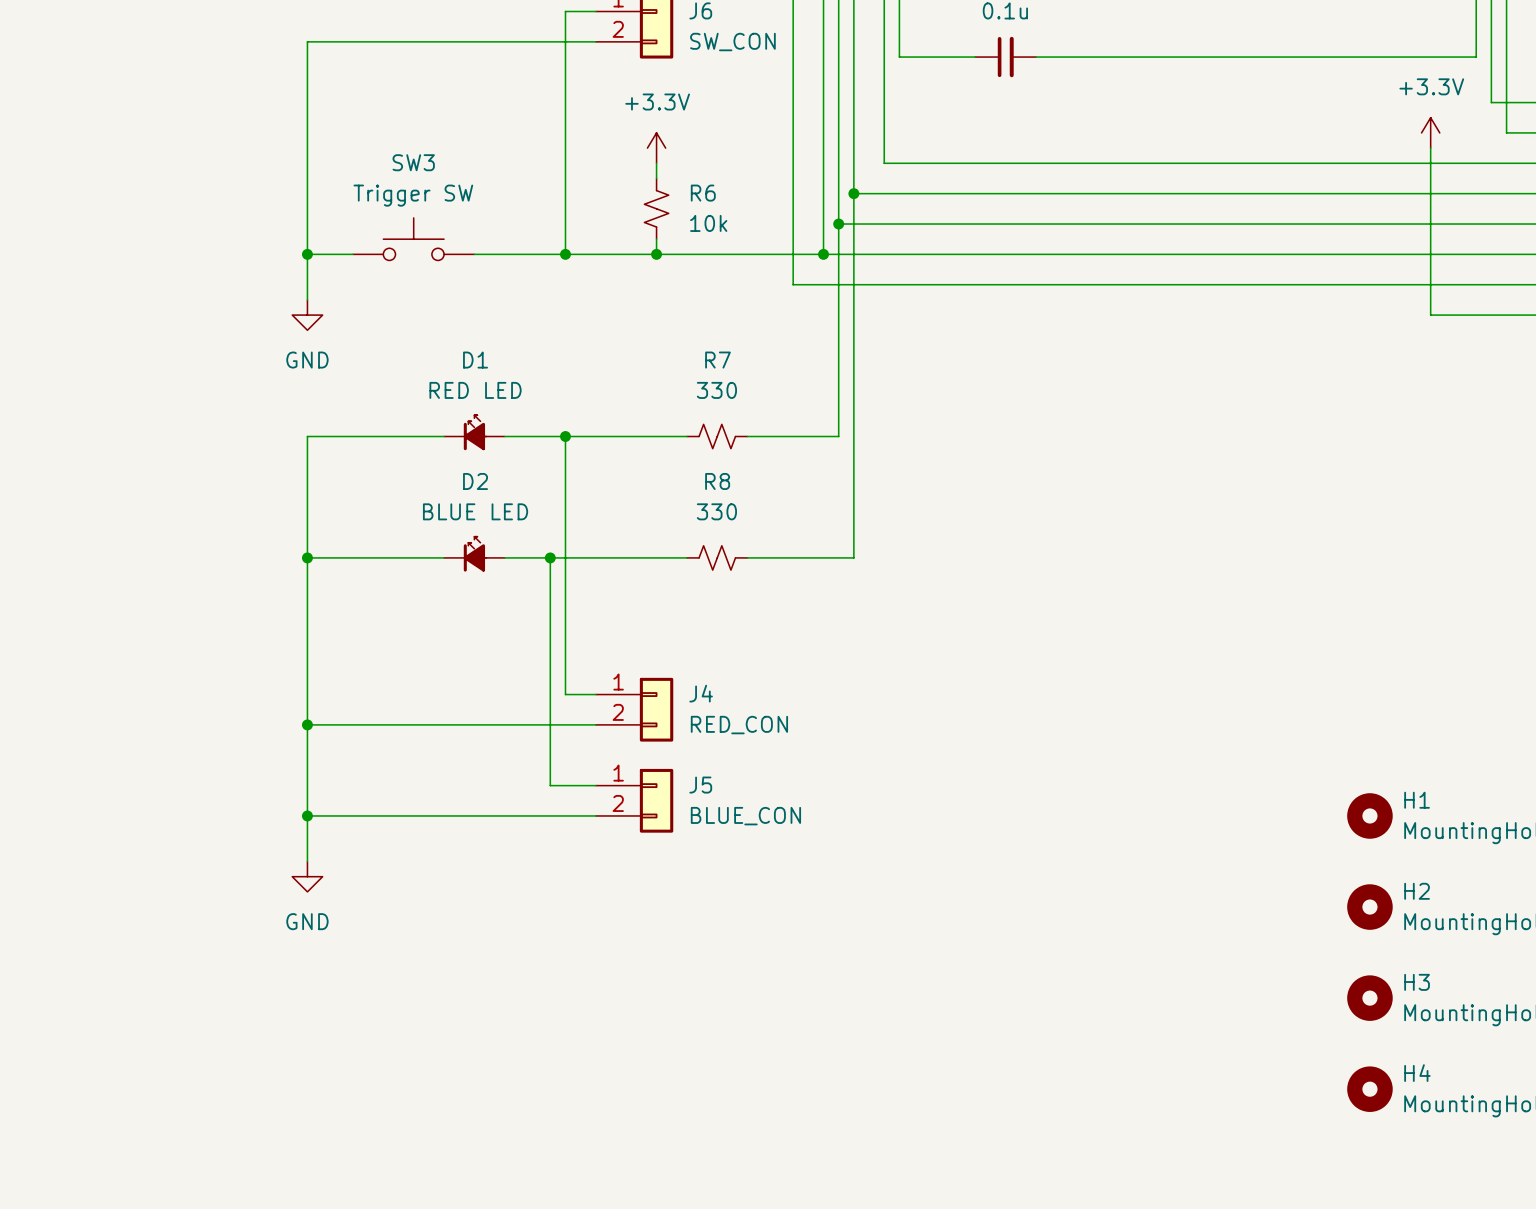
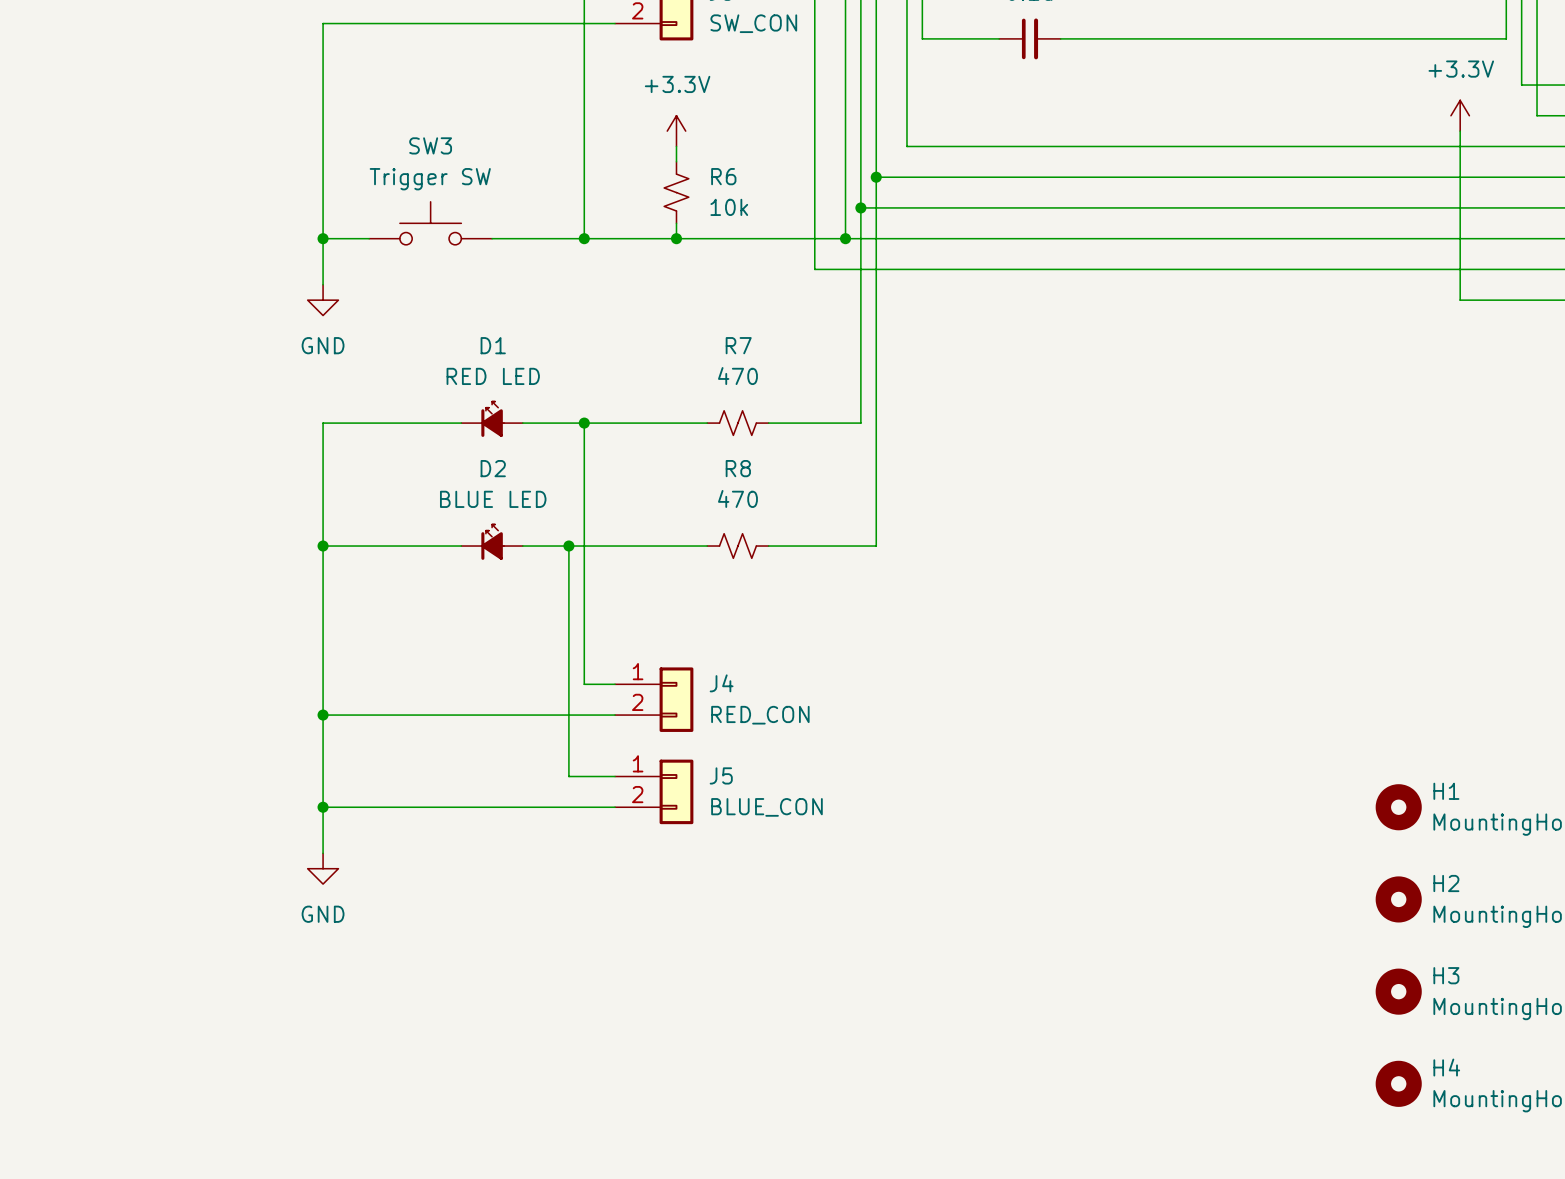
R7 value: 330 (716, 390) -> 470 (737, 376)
R8 value: 330 (716, 511) -> 470 (737, 498)

